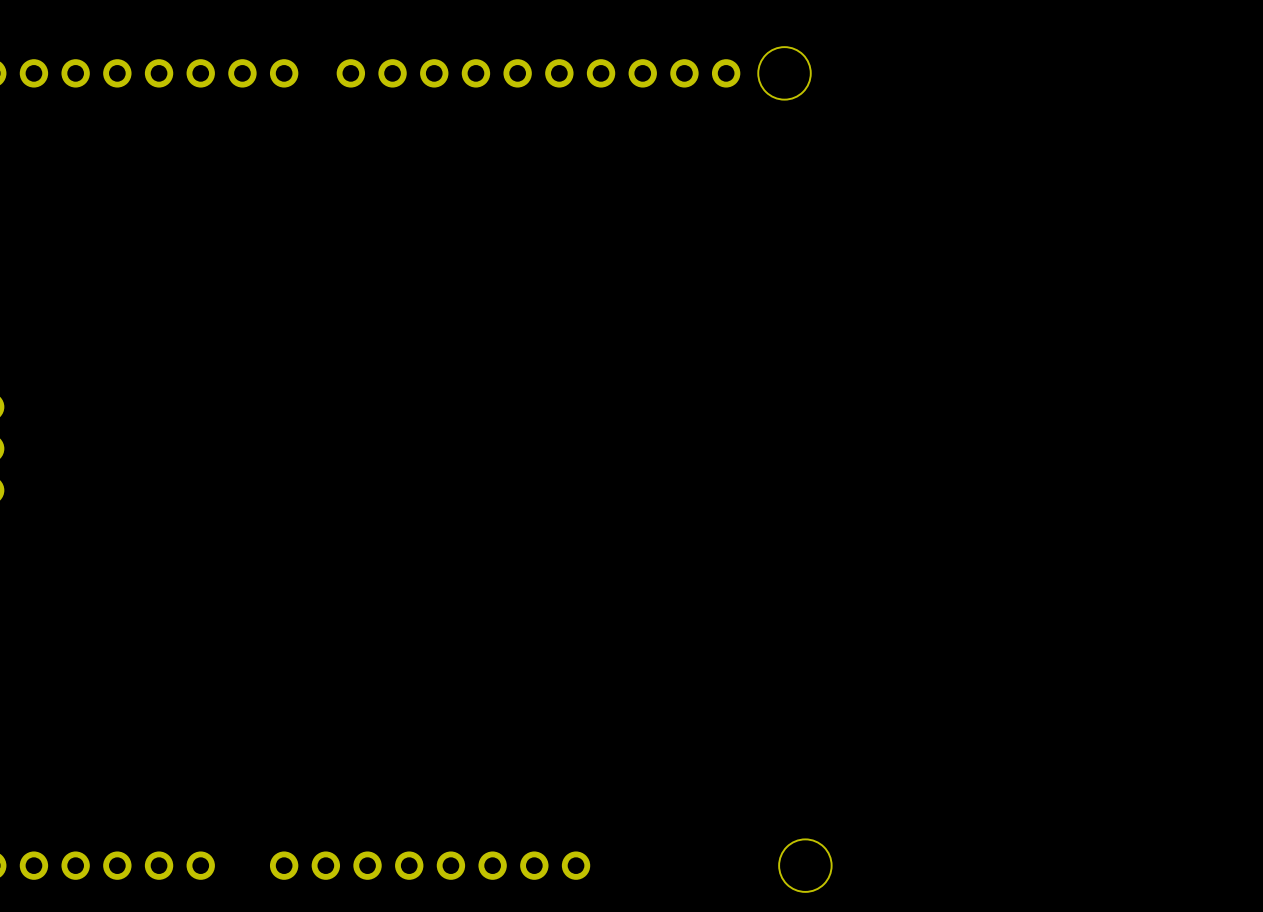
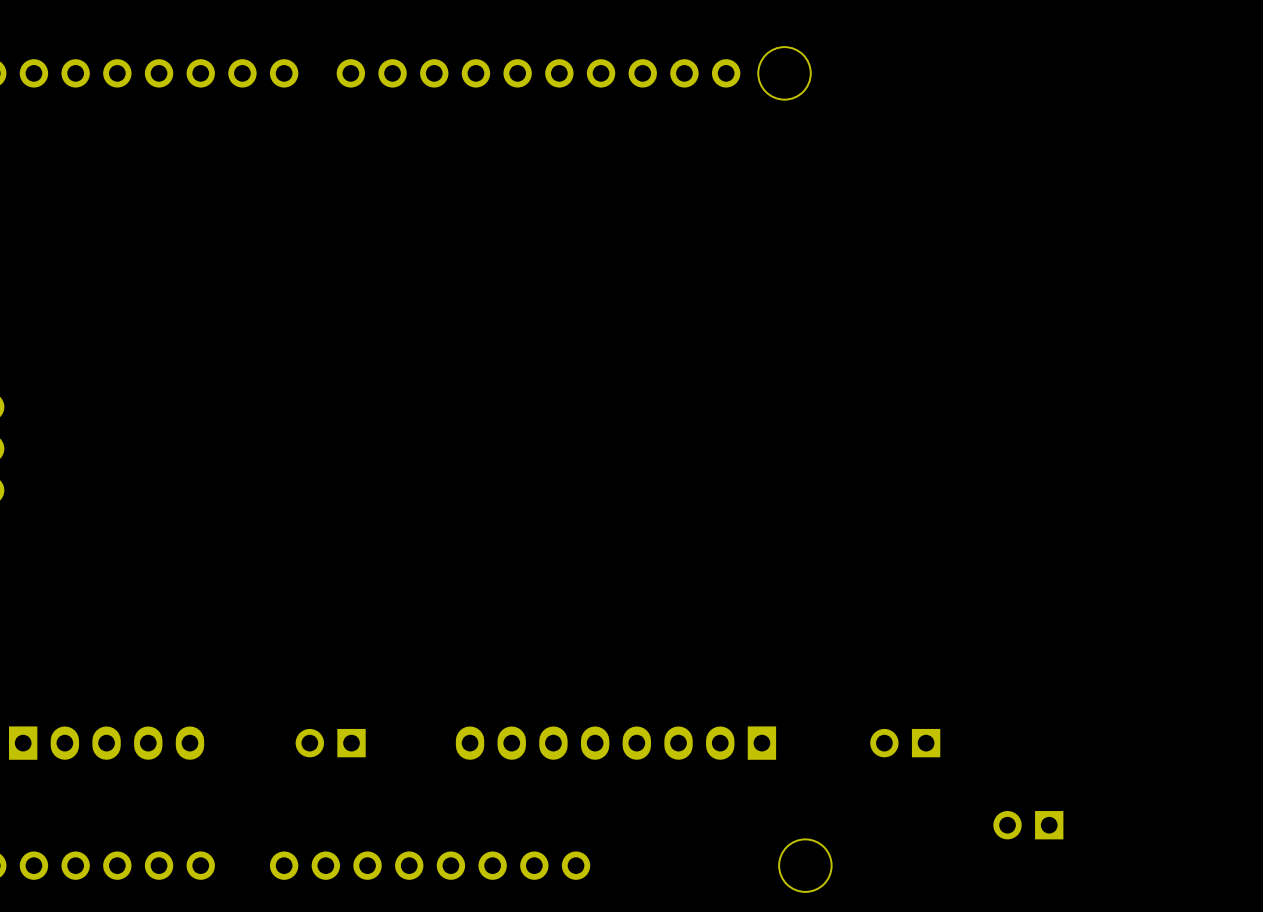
part: none -> (106, 743)
part: none -> (330, 743)
part: none -> (615, 743)
part: none -> (905, 743)
part: none -> (1028, 825)

